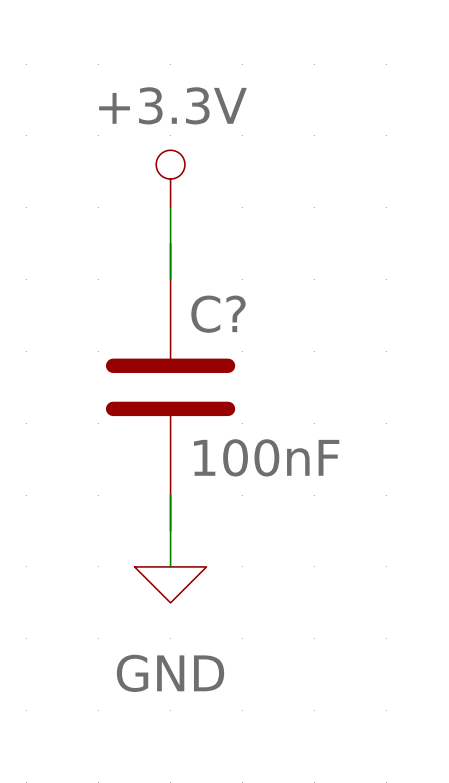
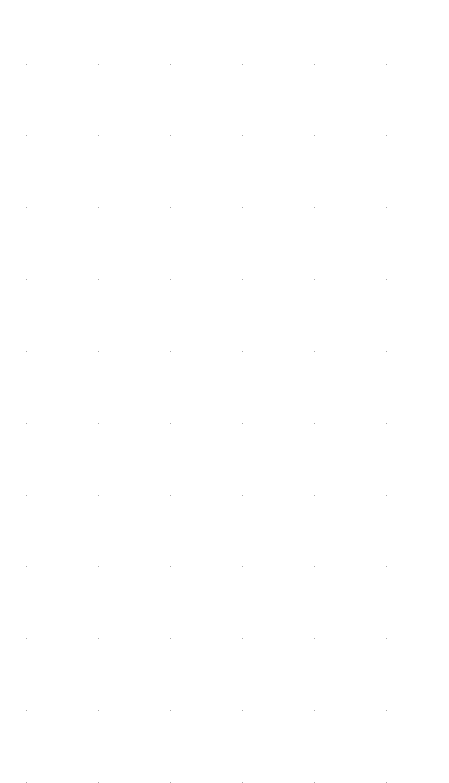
power symbol: +3.3V (170, 179) -> none
wire: (170, 207) (170, 279) -> none
C?: 100nF (170, 387) -> none
wire: (170, 495) (170, 566) -> none
power symbol: GND (170, 584) -> none

